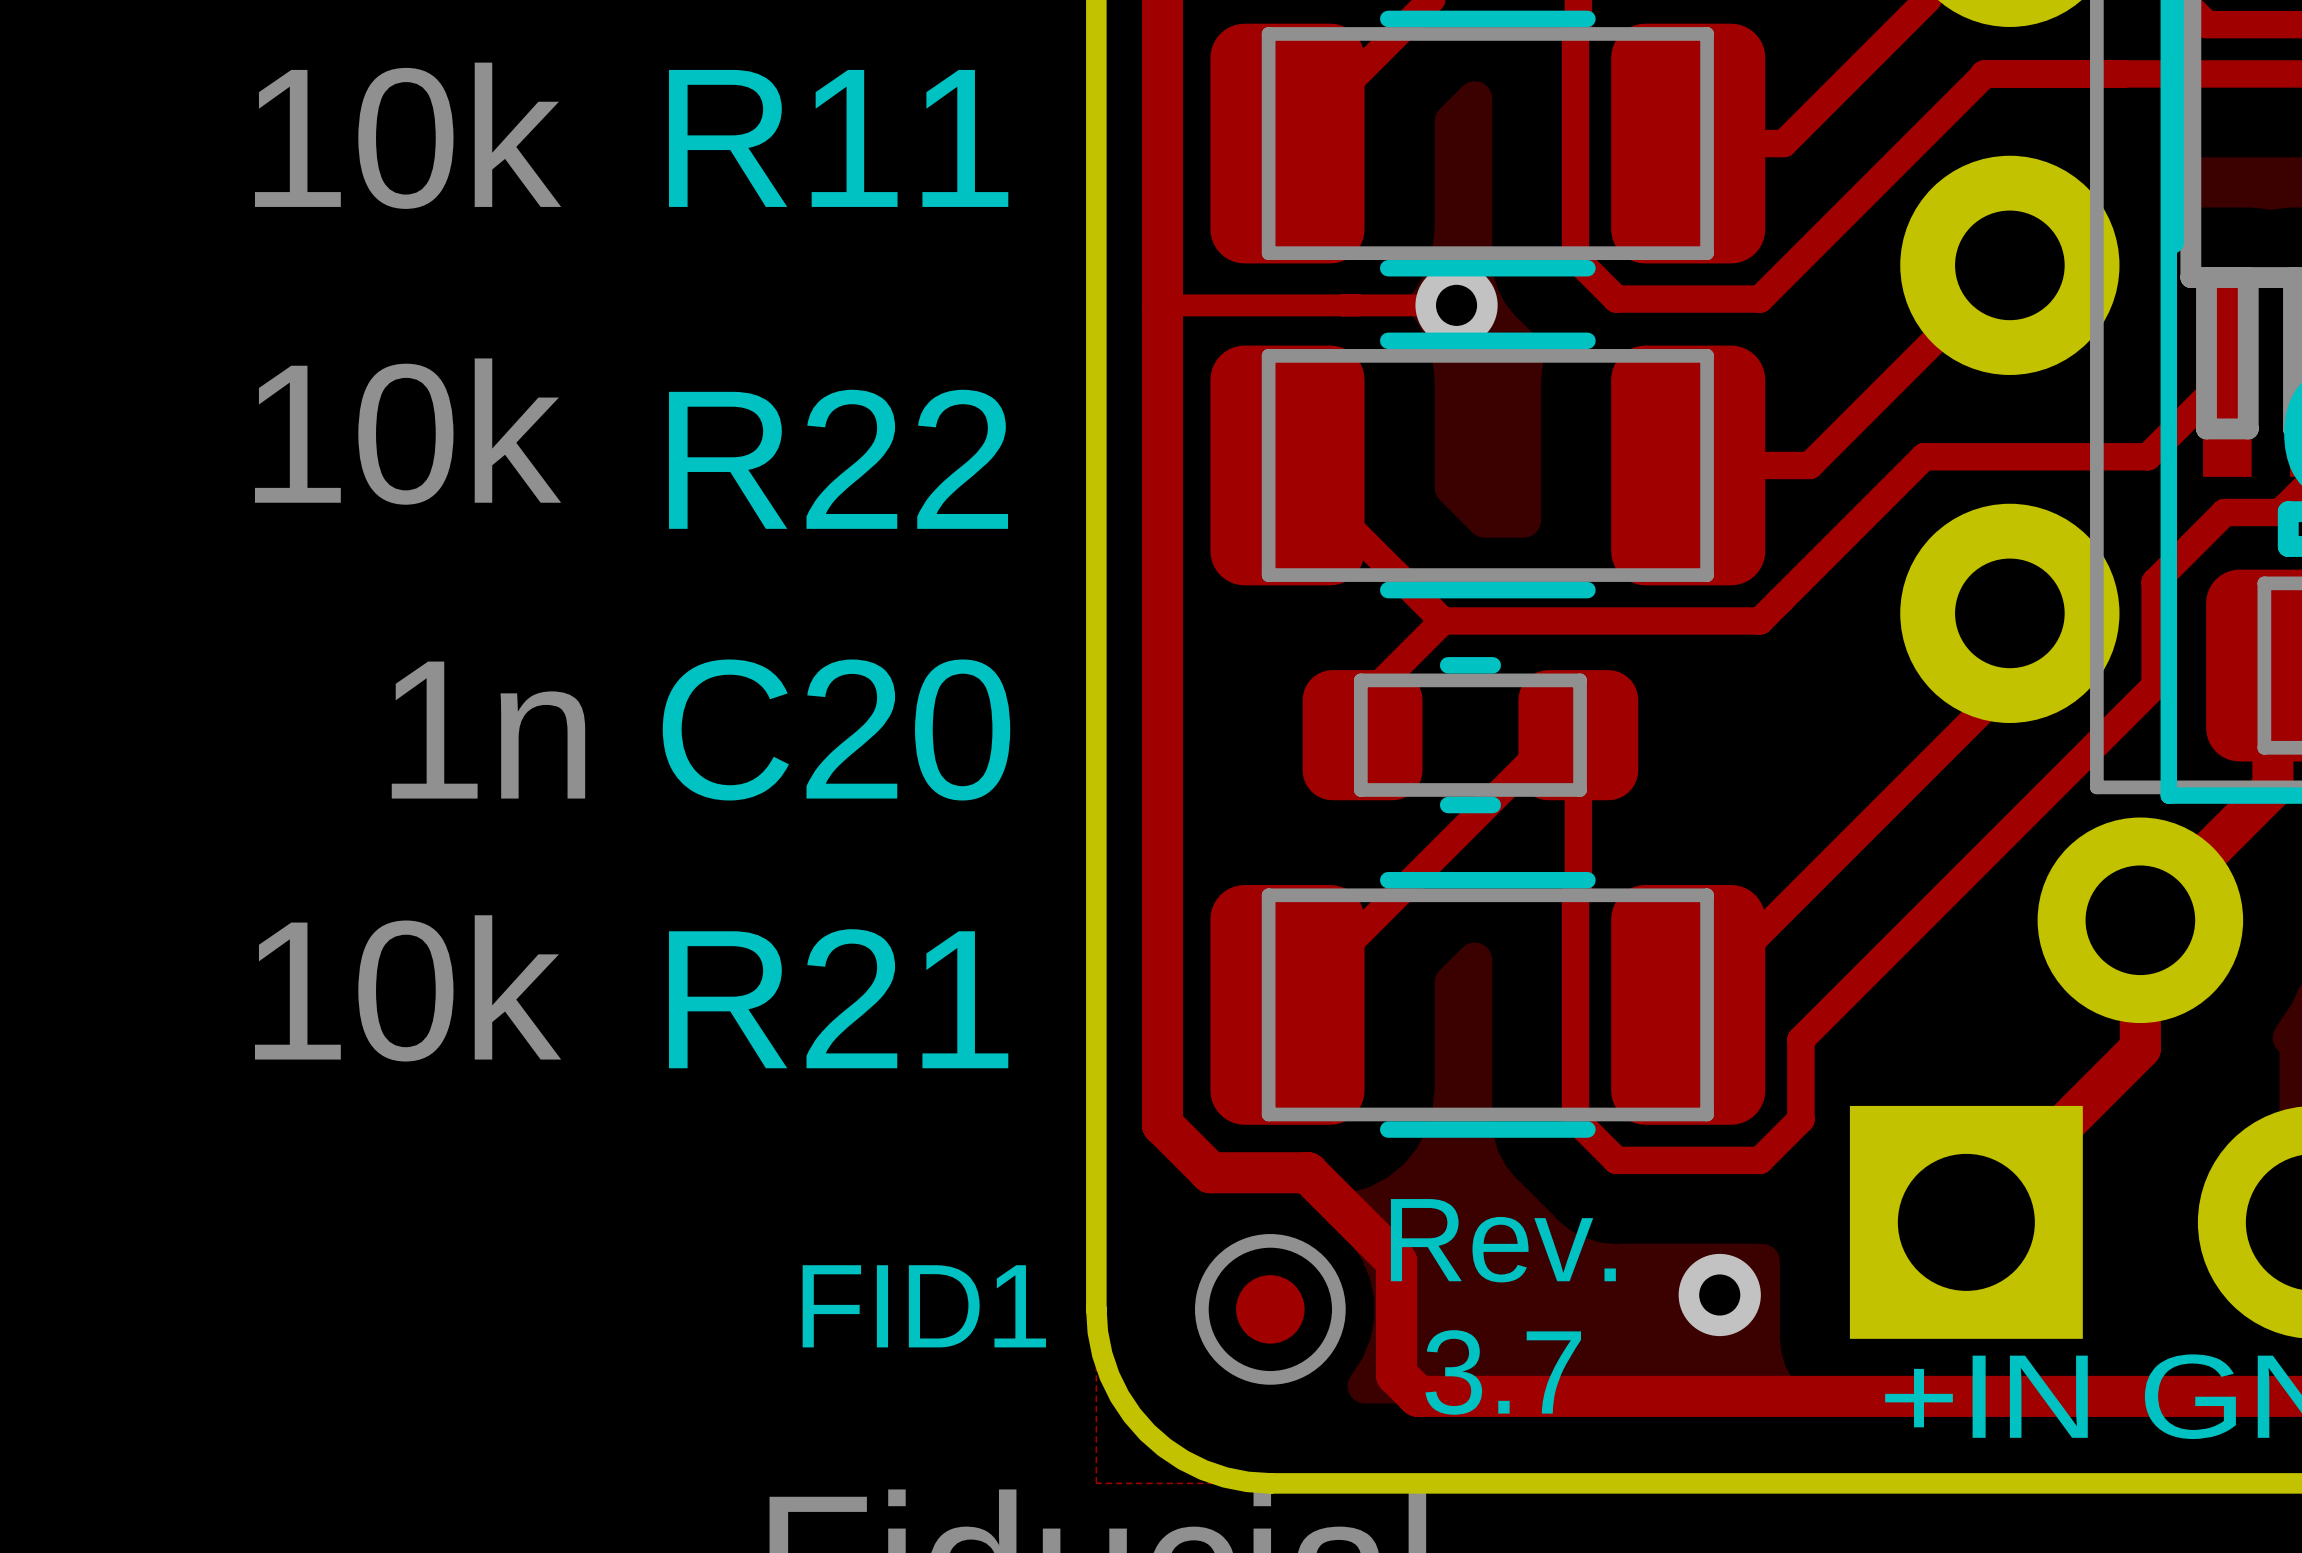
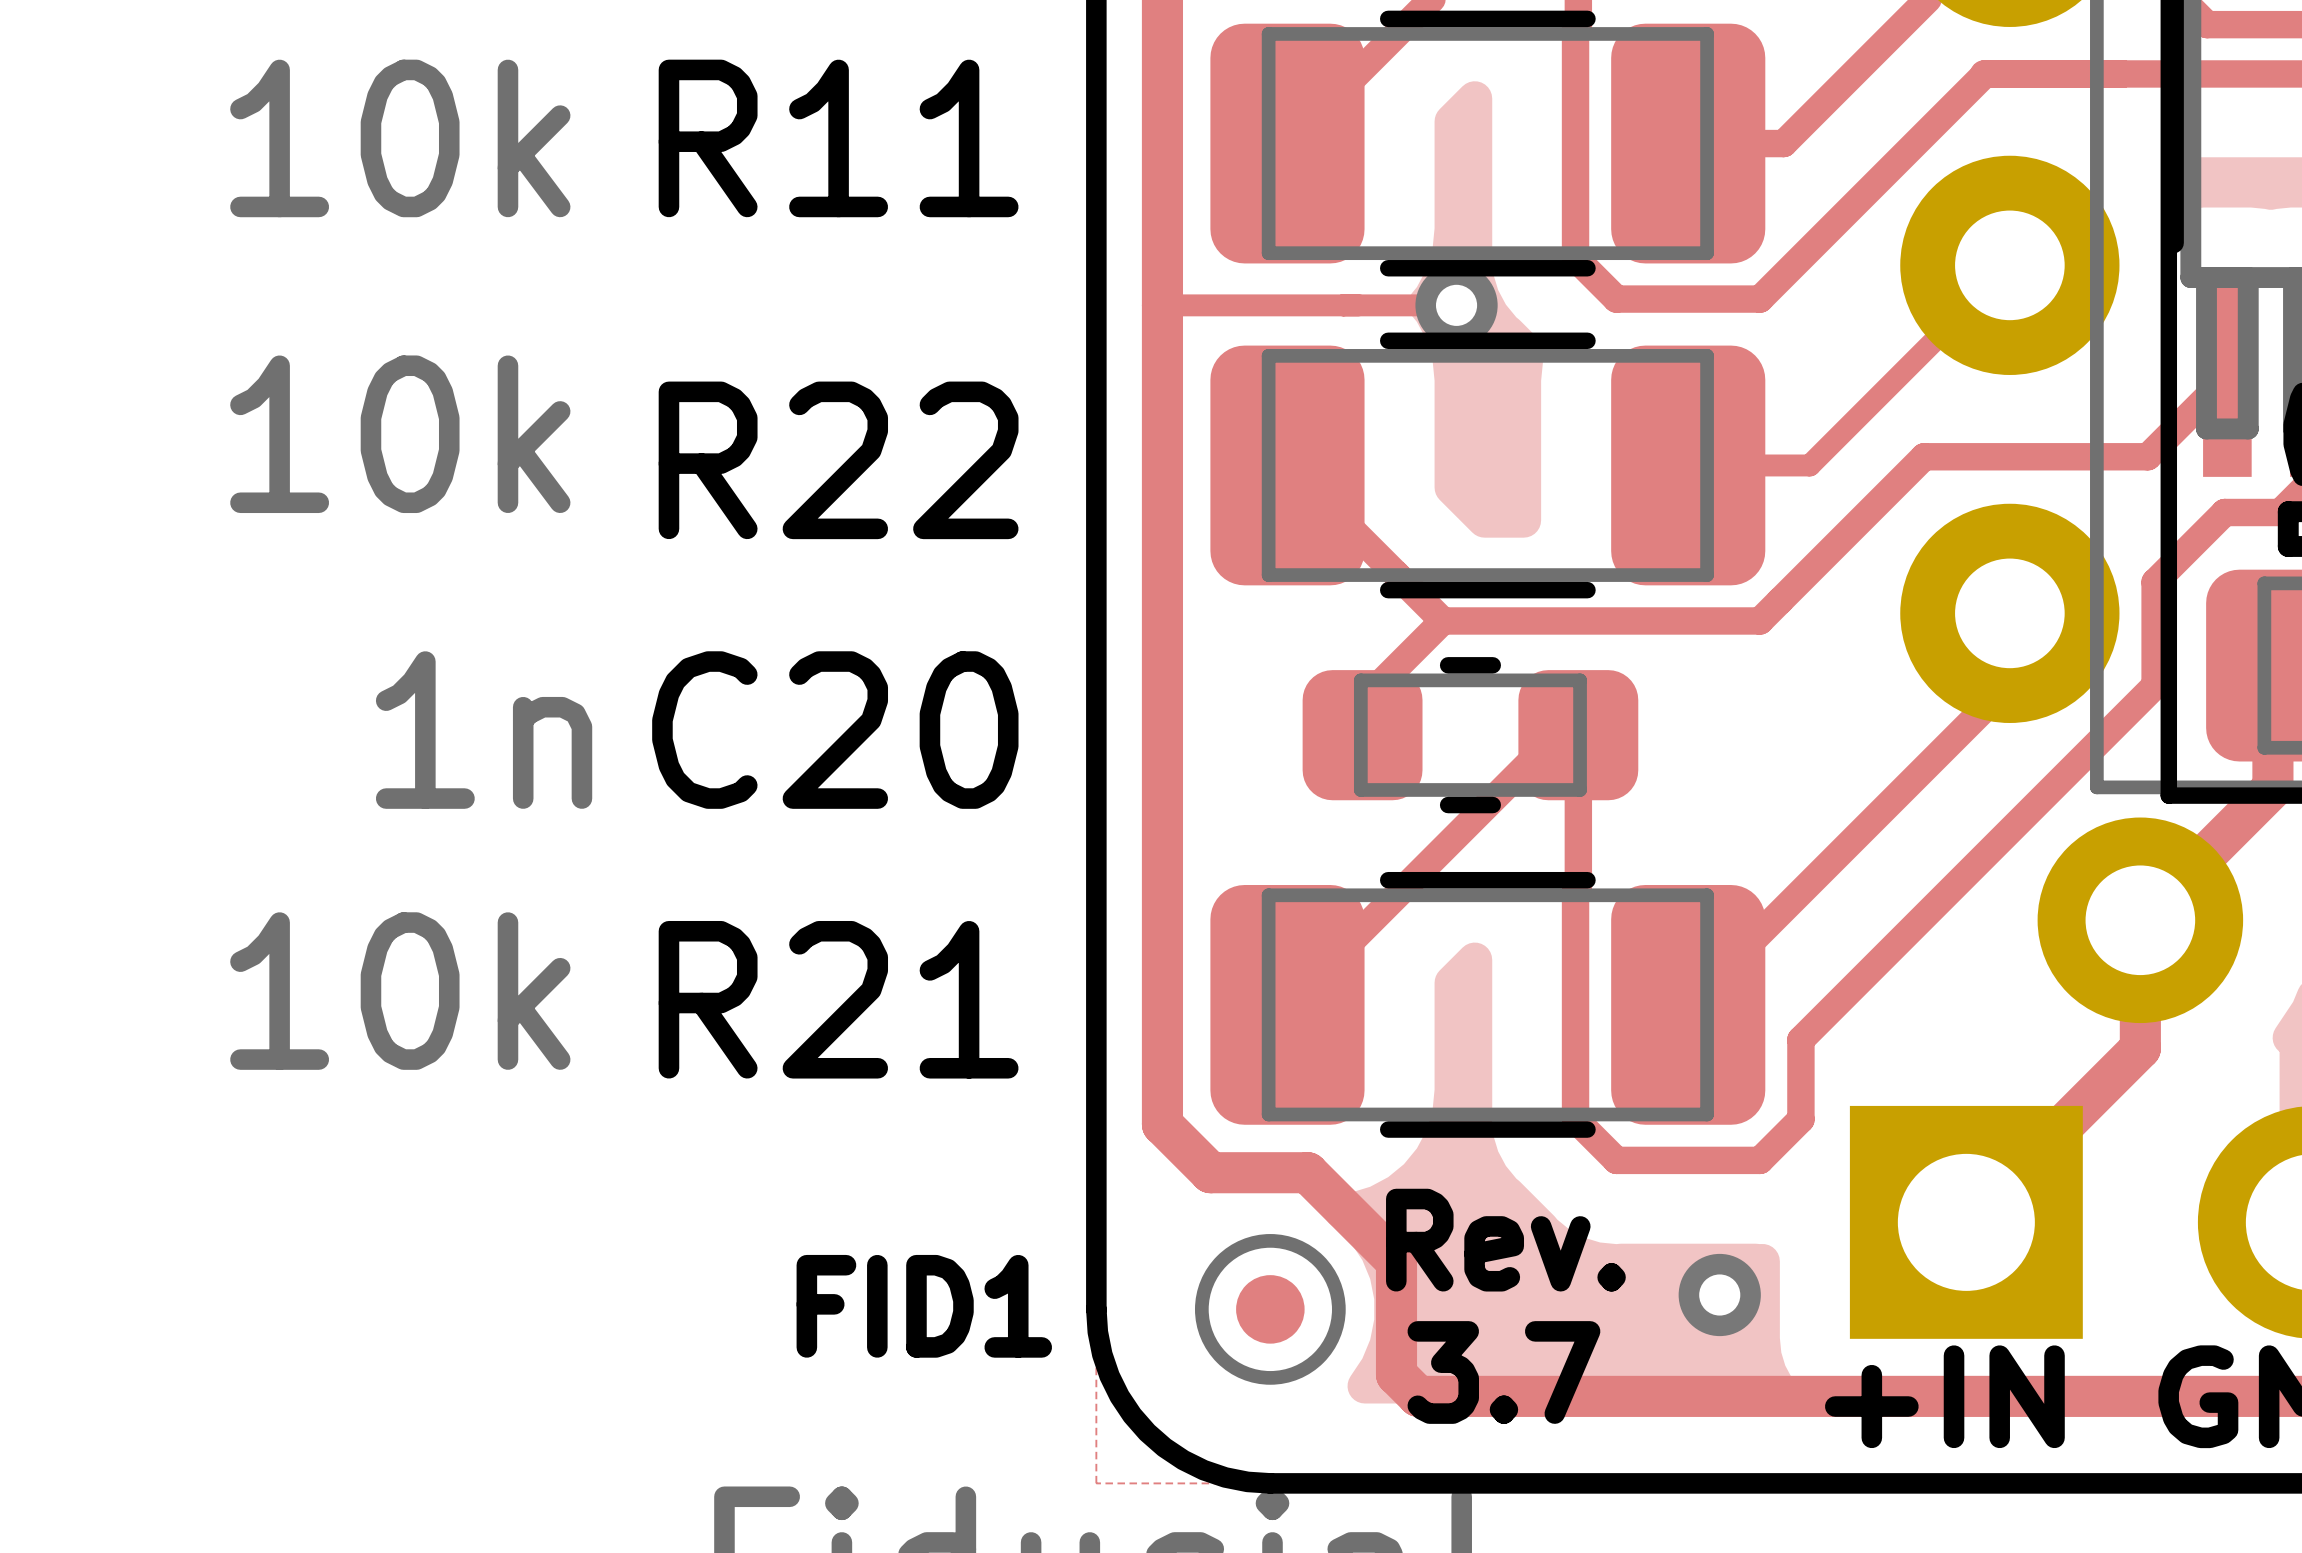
track width: thick (2009, 265) (1809, 465) (1688, 465) -> thin (2009, 265) (1809, 465) (1688, 465)

